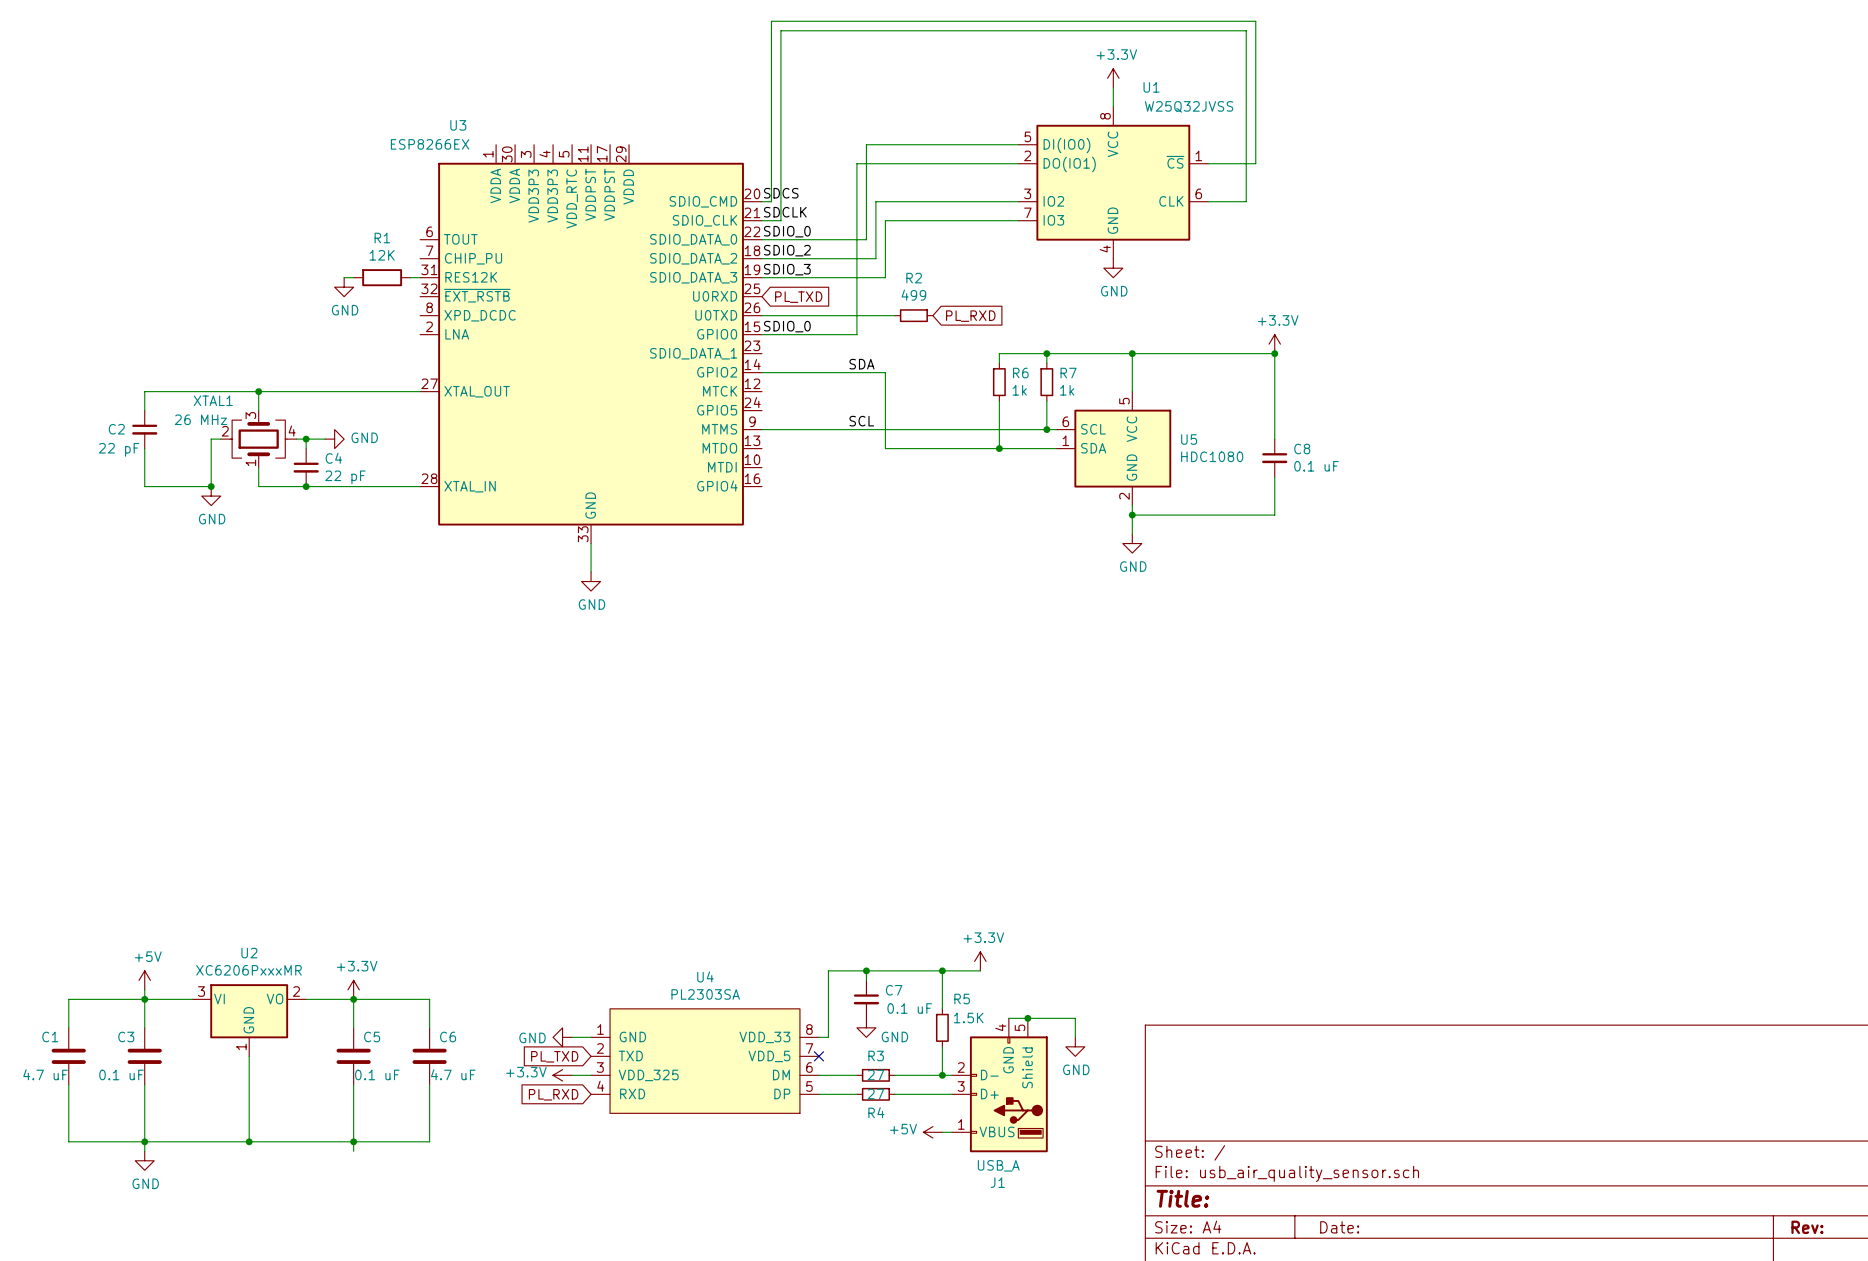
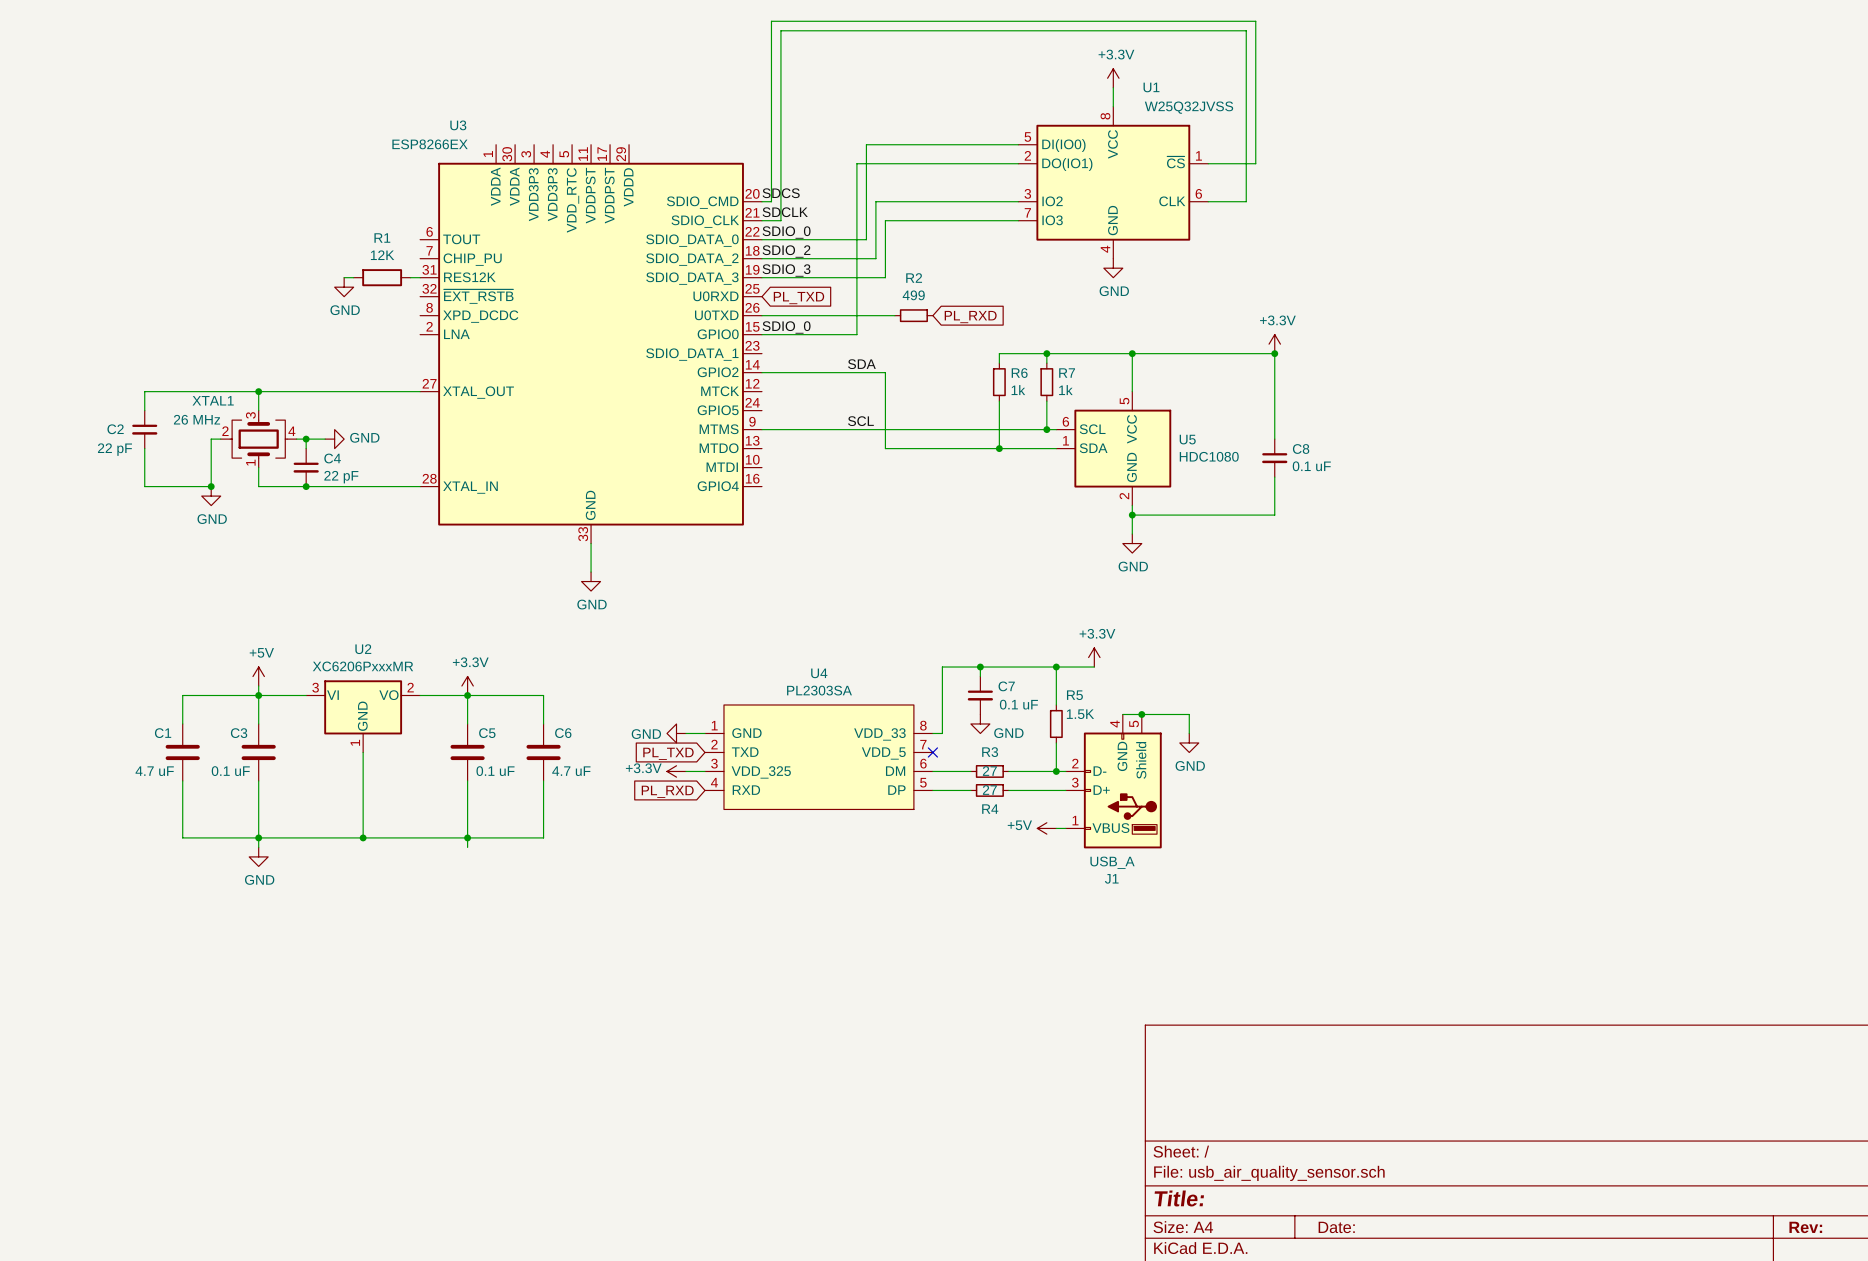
power symbol: none -> +3.3V (1094, 657)
wire: none -> (980, 667) (980, 676)
junction: none -> (980, 667)
wire: none -> (1056, 667) (1056, 704)
junction: none -> (1056, 667)
wire: none -> (1094, 667) (942, 667) (942, 733) (932, 733)
power symbol: none -> +5V (258, 676)
wire: none -> (258, 686) (258, 723)
power symbol: none -> +3.3V (467, 686)
junction: none -> (258, 695)
wire: none -> (306, 695) (182, 695) (182, 723)
wire: none -> (420, 695) (543, 695) (543, 723)
wire: none -> (467, 695) (467, 723)
junction: none -> (467, 695)
wire: none -> (1122, 714) (1189, 714) (1189, 733)
junction: none -> (1141, 714)
power symbol: none -> GND (980, 723)
power symbol: none -> GND (676, 733)
wire: none -> (686, 733) (704, 733)
wire: none -> (1056, 742) (1056, 771)
power symbol: none -> GND (1189, 742)
wire: none -> (363, 752) (363, 837)
global label: none -> PL_TXD (668, 753)
no-connect mark: none -> (932, 752)
power symbol: none -> +3.3V (676, 771)
wire: none -> (686, 771) (704, 771)
wire: none -> (932, 771) (970, 771)
wire: none -> (1008, 771) (1065, 771)
junction: none -> (1056, 771)
wire: none -> (182, 780) (182, 837) (543, 837) (543, 780)
wire: none -> (258, 780) (258, 847)
wire: none -> (467, 780) (467, 847)
global label: none -> PL_RXD (667, 791)
wire: none -> (932, 790) (970, 790)
wire: none -> (1008, 790) (1065, 790)
power symbol: none -> +5V (1046, 828)
wire: none -> (1056, 828) (1065, 828)
junction: none -> (258, 837)
junction: none -> (363, 837)
junction: none -> (467, 837)
power symbol: none -> GND (258, 856)
power symbol: +3.3V (980, 961) -> none
wire: (866, 970) (866, 980) -> none
junction: (866, 970) -> none
wire: (942, 970) (942, 1008) -> none
junction: (942, 970) -> none
wire: (980, 970) (828, 970) (828, 1037) (818, 1037) -> none
power symbol: +5V (144, 980) -> none
wire: (144, 989) (144, 1027) -> none
power symbol: +3.3V (353, 989) -> none
junction: (144, 999) -> none
wire: (192, 999) (68, 999) (68, 1027) -> none
wire: (306, 999) (429, 999) (429, 1027) -> none
wire: (353, 999) (353, 1027) -> none
junction: (353, 999) -> none
C7 position: (866, 999) -> (980, 695)
wire: (1008, 1018) (1075, 1018) (1075, 1037) -> none
junction: (1027, 1018) -> none
U2 position: (249, 1020) -> (363, 716)
power symbol: GND (866, 1027) -> none
R5 position: (942, 1027) -> (1056, 723)
power symbol: GND (562, 1037) -> none
wire: (572, 1037) (591, 1037) -> none
wire: (942, 1046) (942, 1075) -> none
power symbol: GND (1075, 1046) -> none
C1 position: (68, 1056) -> (182, 752)
C3 position: (144, 1056) -> (258, 752)
wire: (249, 1056) (249, 1141) -> none
C5 position: (353, 1056) -> (467, 752)
C6 position: (429, 1056) -> (543, 752)
global label: PL_TXD (554, 1056) -> none
no-connect mark: (818, 1056) -> none
U4 position: (704, 1061) -> (818, 757)
power symbol: +3.3V (562, 1075) -> none
wire: (572, 1075) (591, 1075) -> none
wire: (818, 1075) (856, 1075) -> none
R3 position: (875, 1075) -> (989, 771)
wire: (894, 1075) (951, 1075) -> none
junction: (942, 1075) -> none
wire: (68, 1084) (68, 1141) (429, 1141) (429, 1084) -> none
wire: (144, 1084) (144, 1151) -> none
wire: (353, 1084) (353, 1151) -> none
J1 position: (999, 1085) -> (1113, 781)
global label: PL_RXD (553, 1094) -> none
wire: (818, 1094) (856, 1094) -> none
R4 position: (875, 1094) -> (989, 790)
wire: (894, 1094) (951, 1094) -> none
power symbol: +5V (932, 1132) -> none
wire: (942, 1132) (951, 1132) -> none
junction: (144, 1141) -> none
junction: (249, 1141) -> none
junction: (353, 1141) -> none
power symbol: GND (144, 1160) -> none

